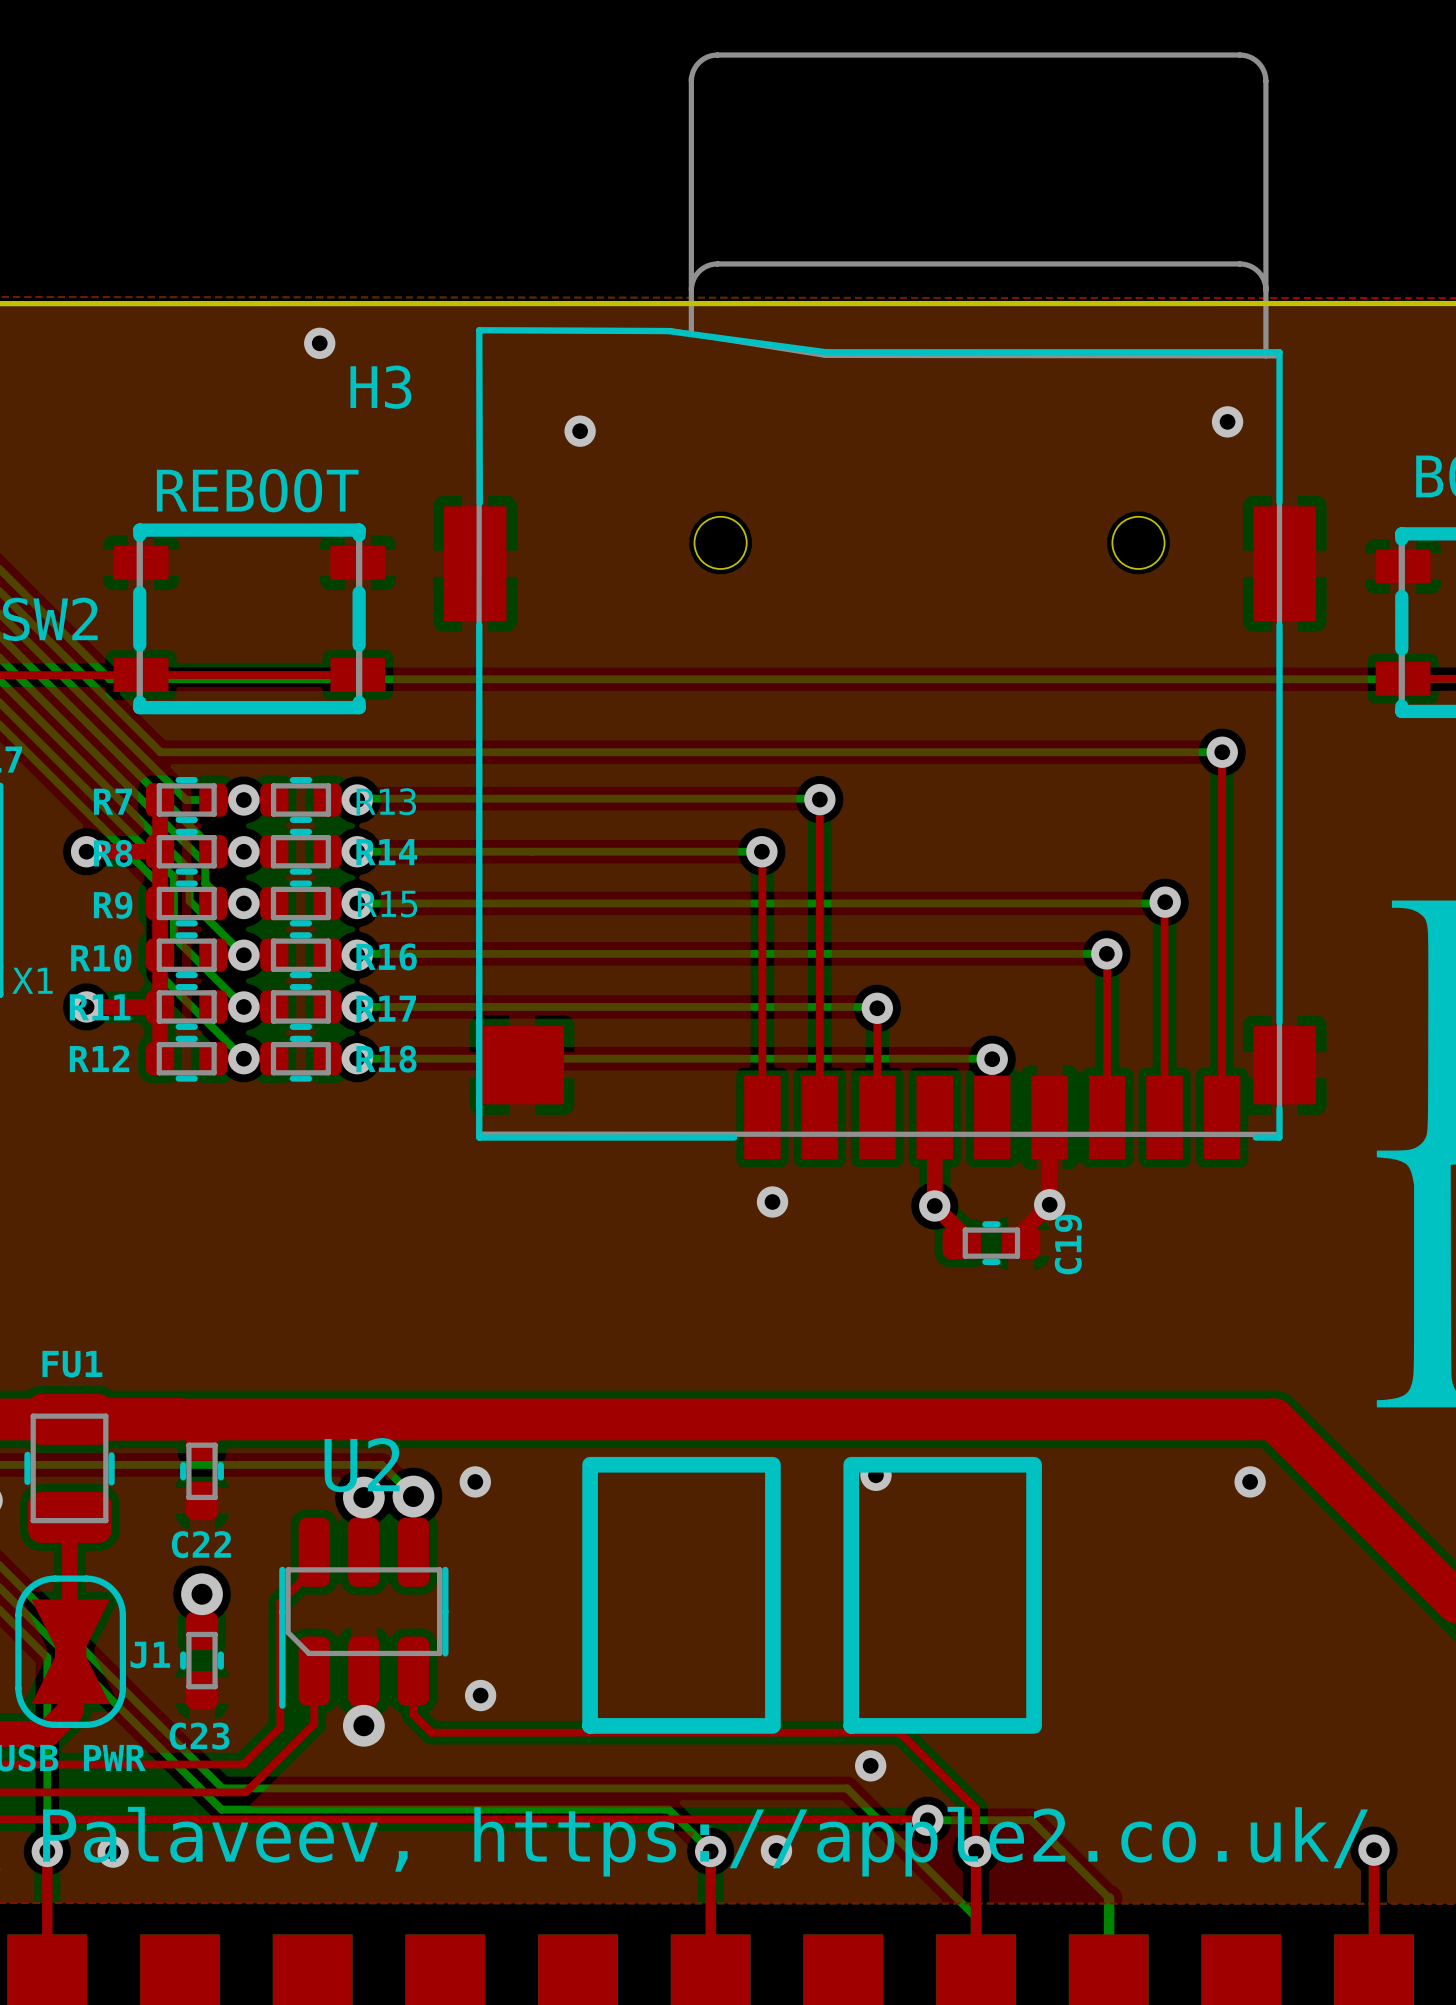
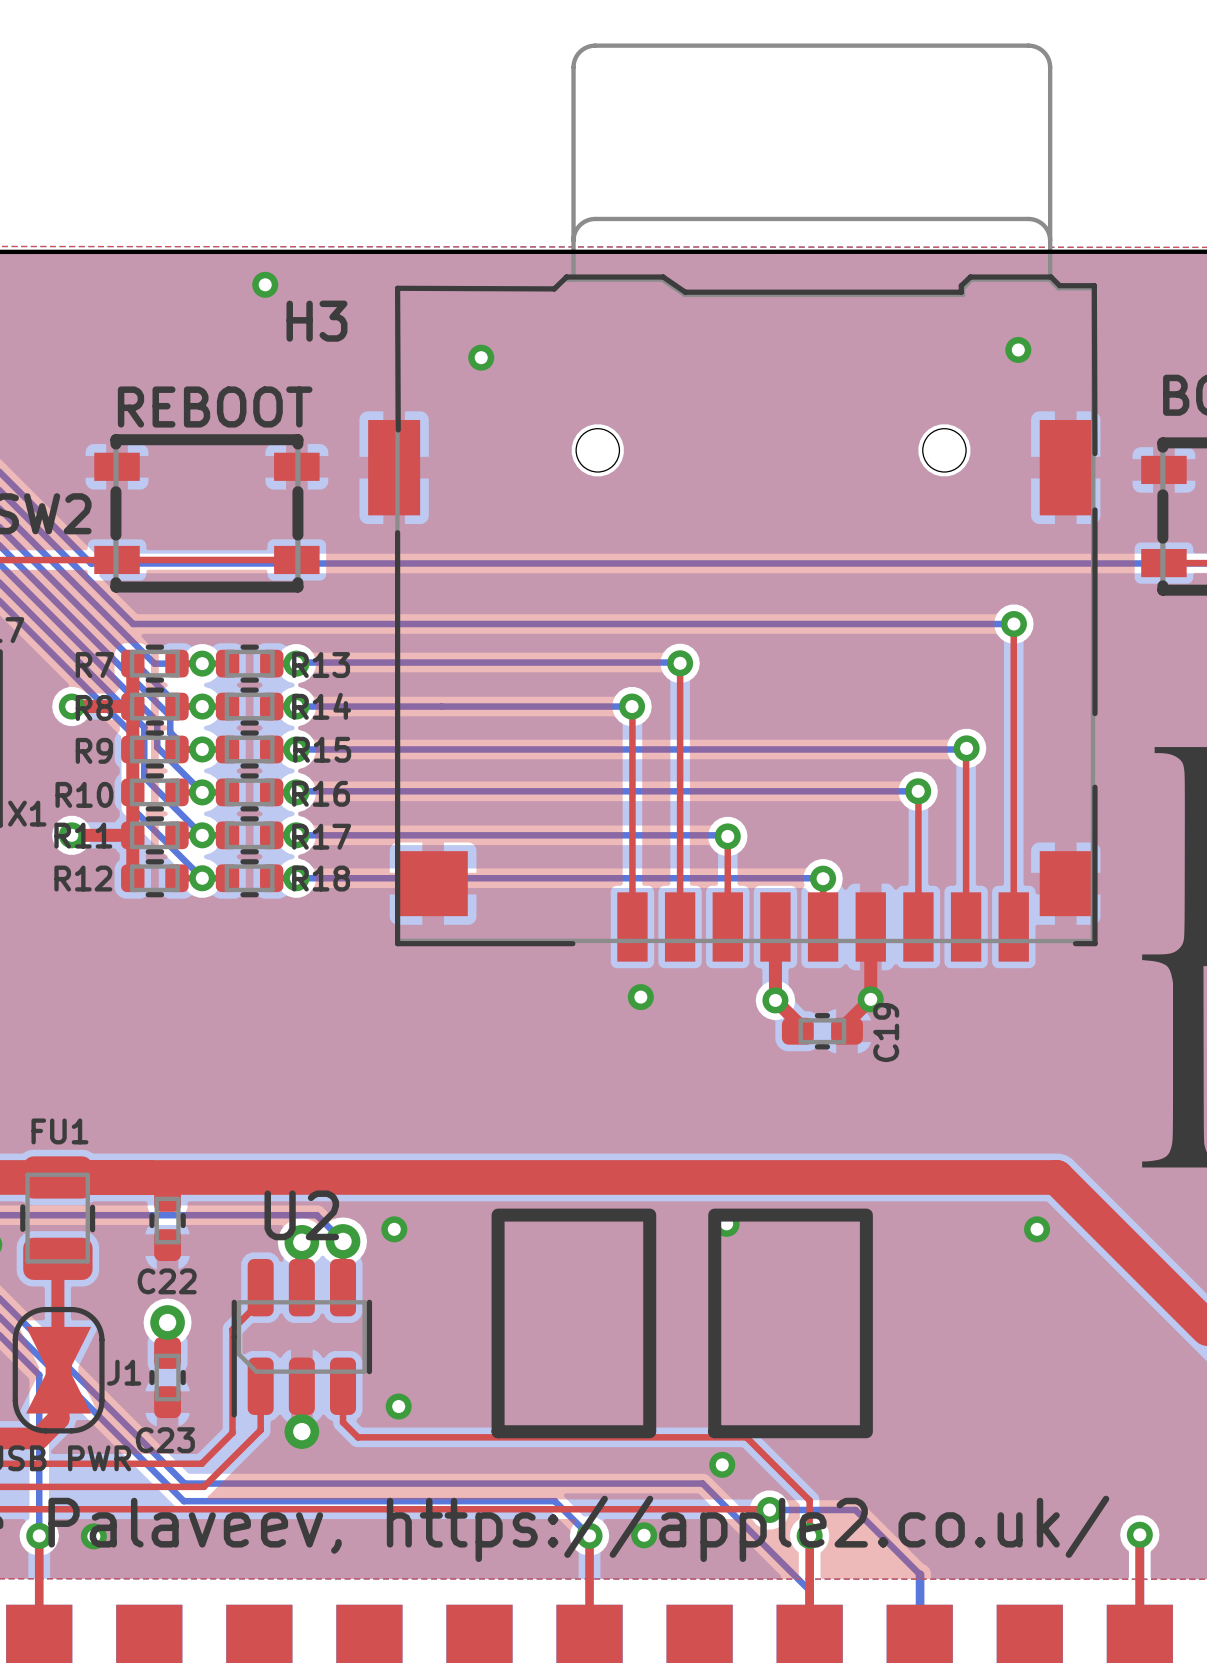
H3 footprint: [443, 52, 1317, 1160] -> [368, 43, 1098, 962]

